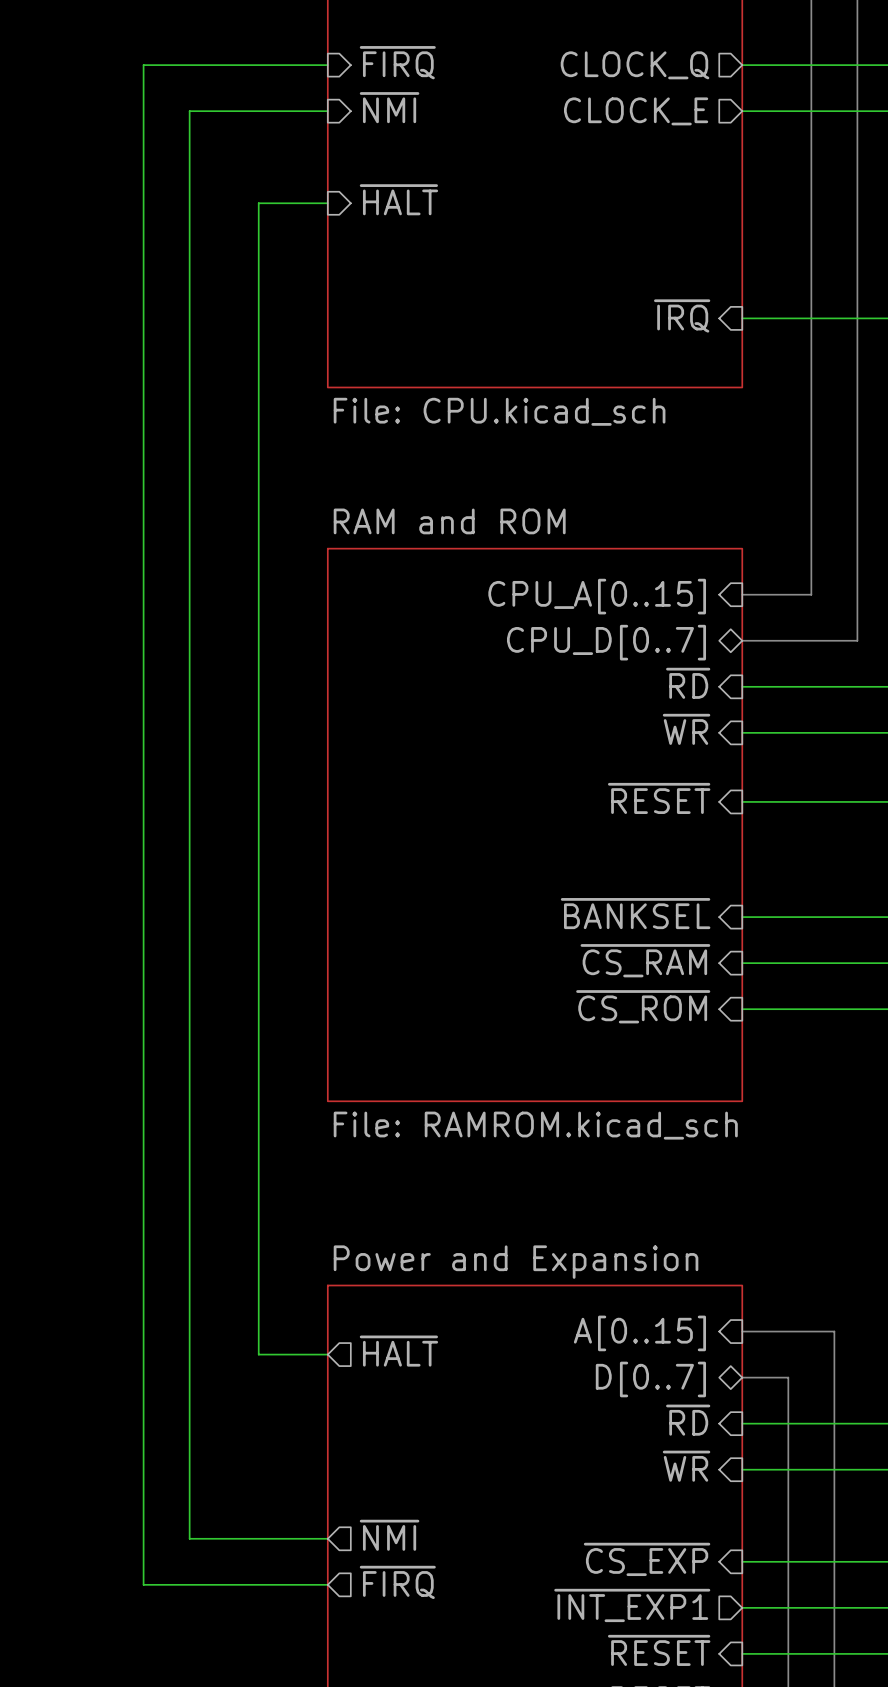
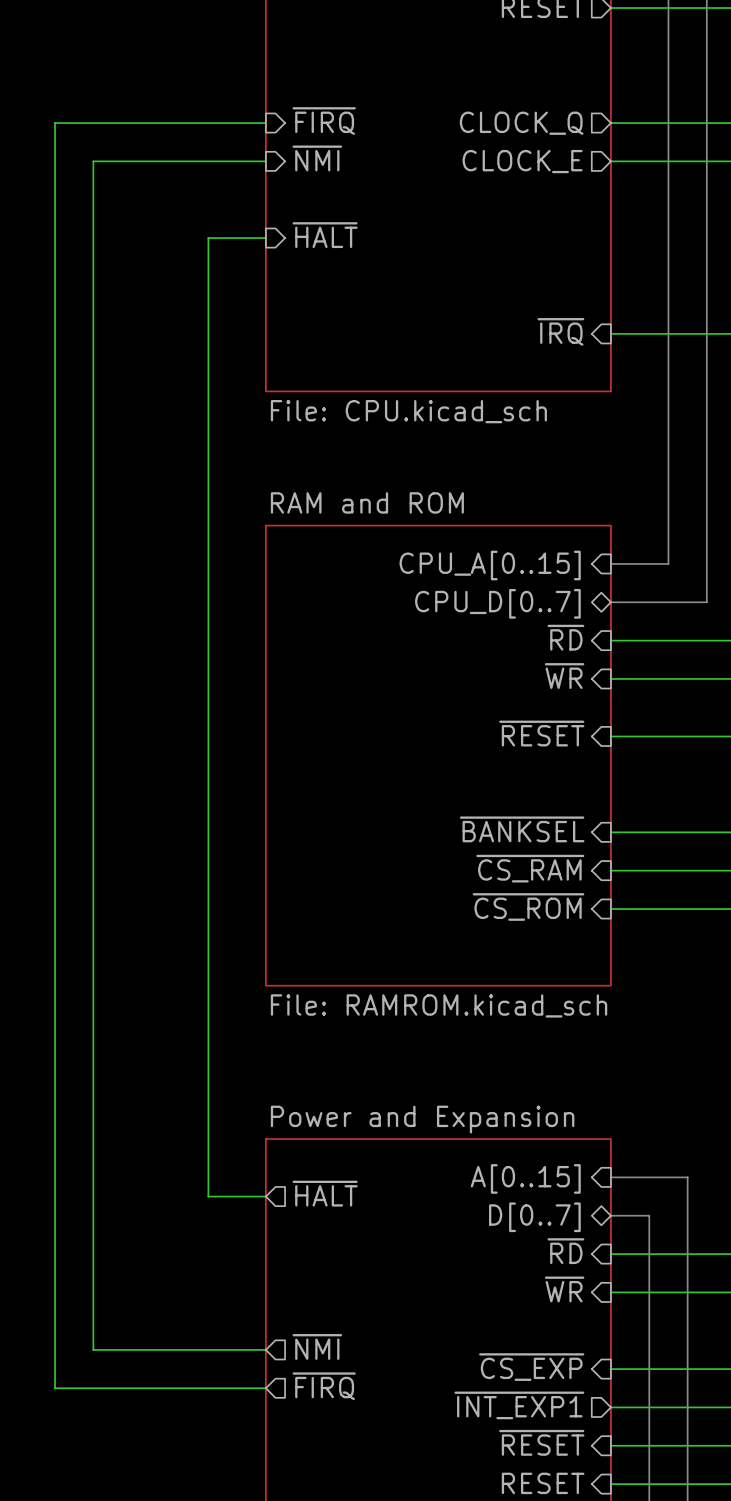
wire: (143, 65) (143, 1584) -> (112, 123) (55, 123) (55, 1388) (112, 1388)
wire: (189, 111) (189, 1538) -> (150, 161) (93, 161) (93, 1349) (150, 1349)

